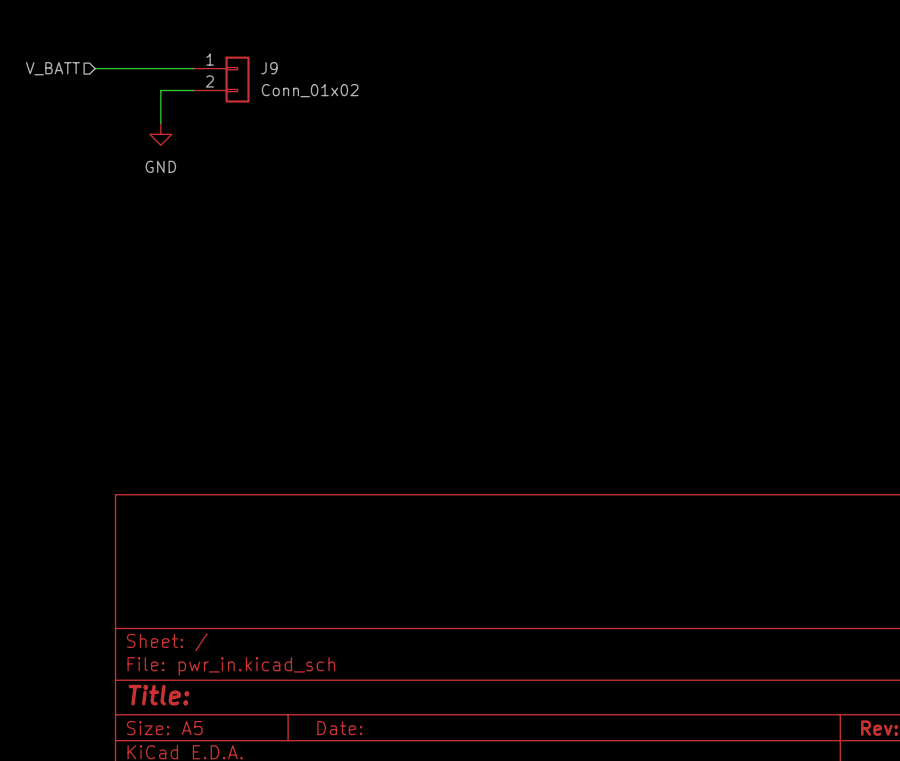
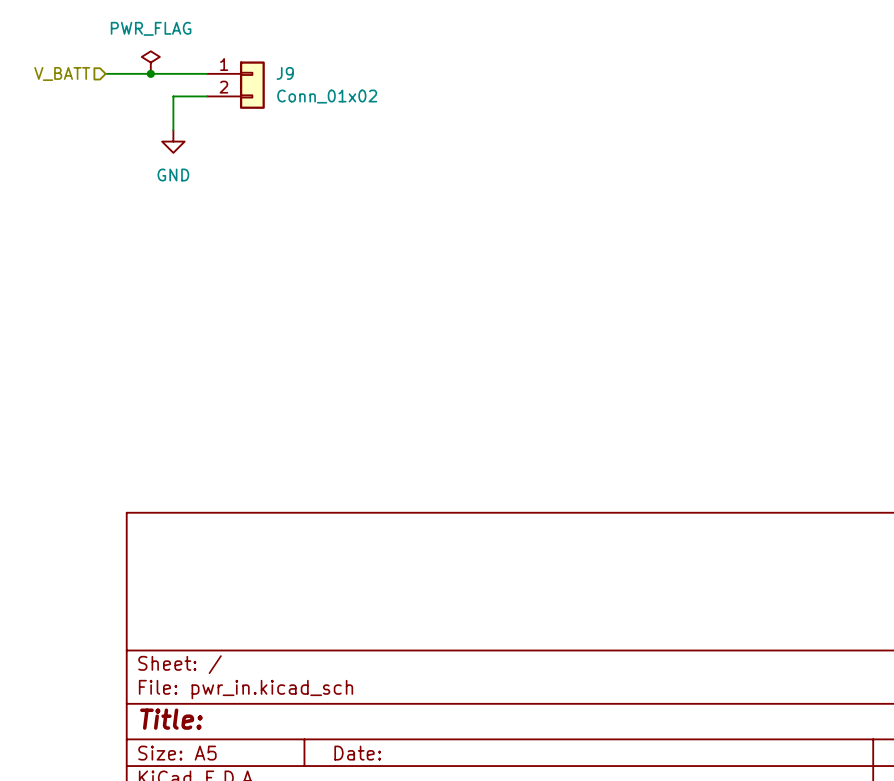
power symbol: none -> PWR_FLAG (150, 62)
junction: none -> (150, 73)

